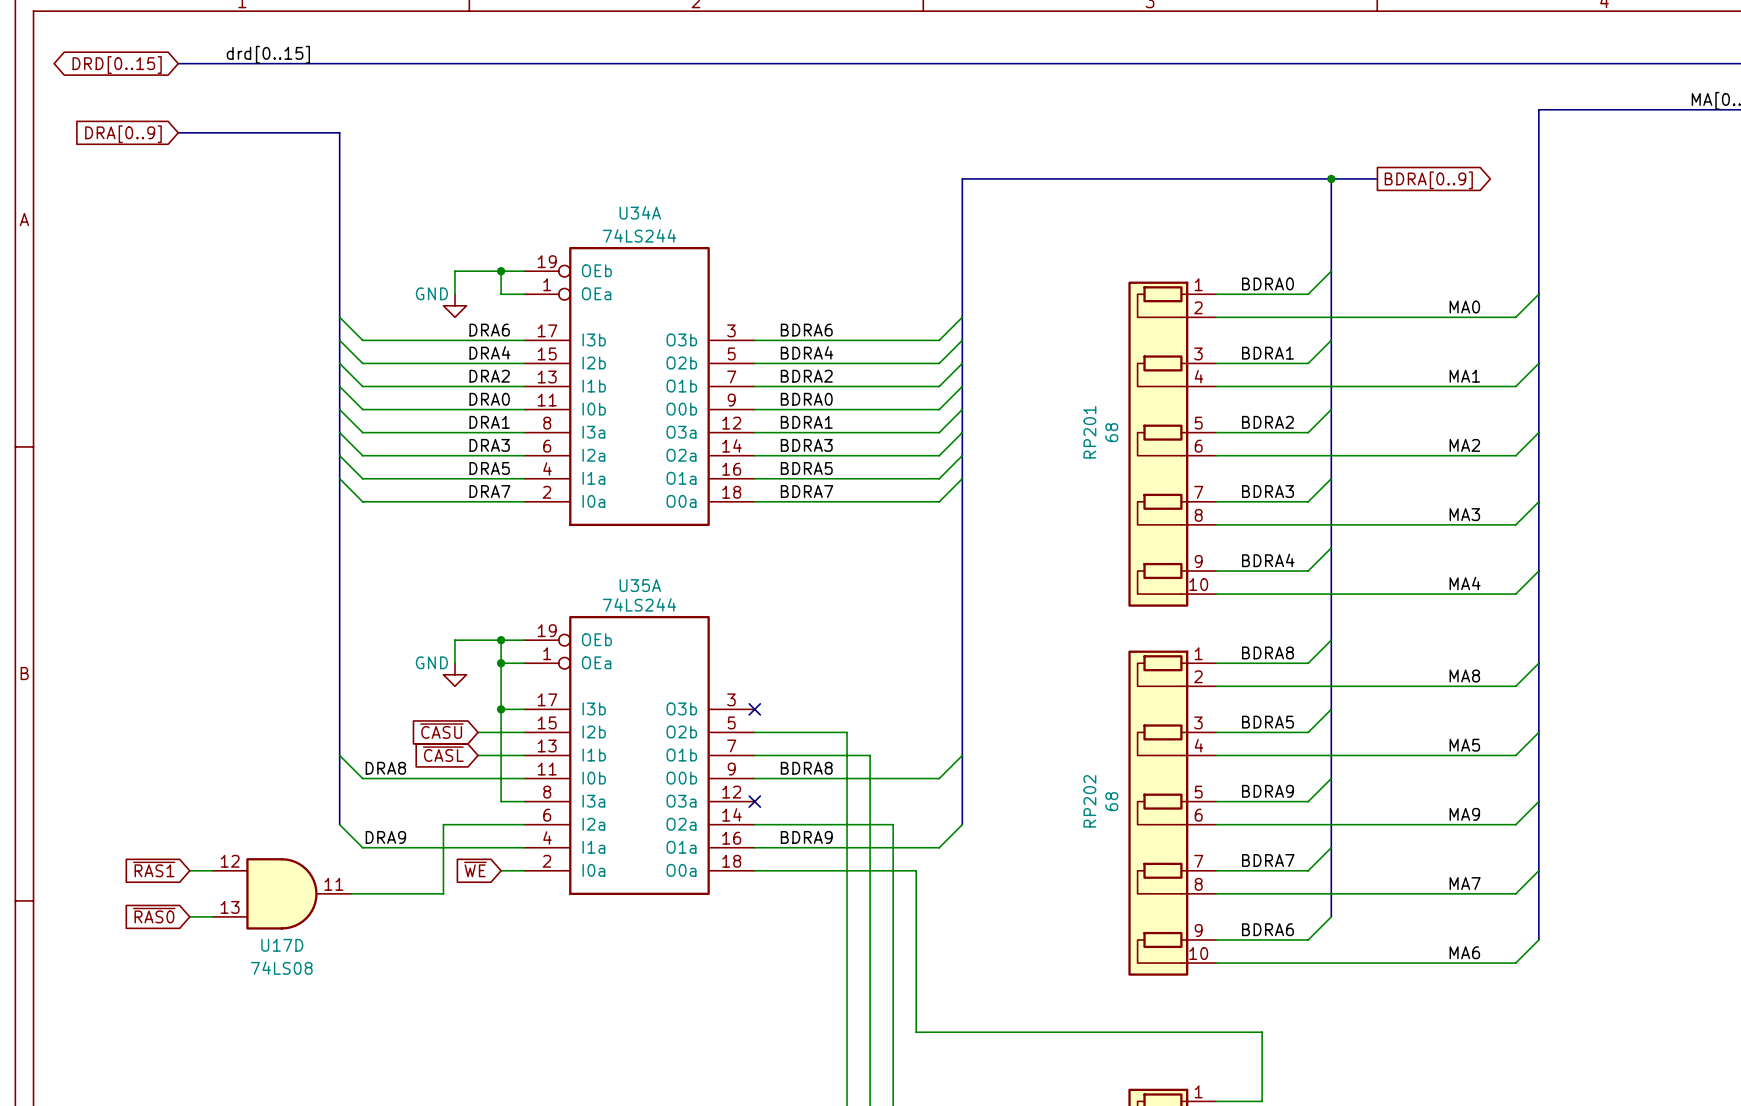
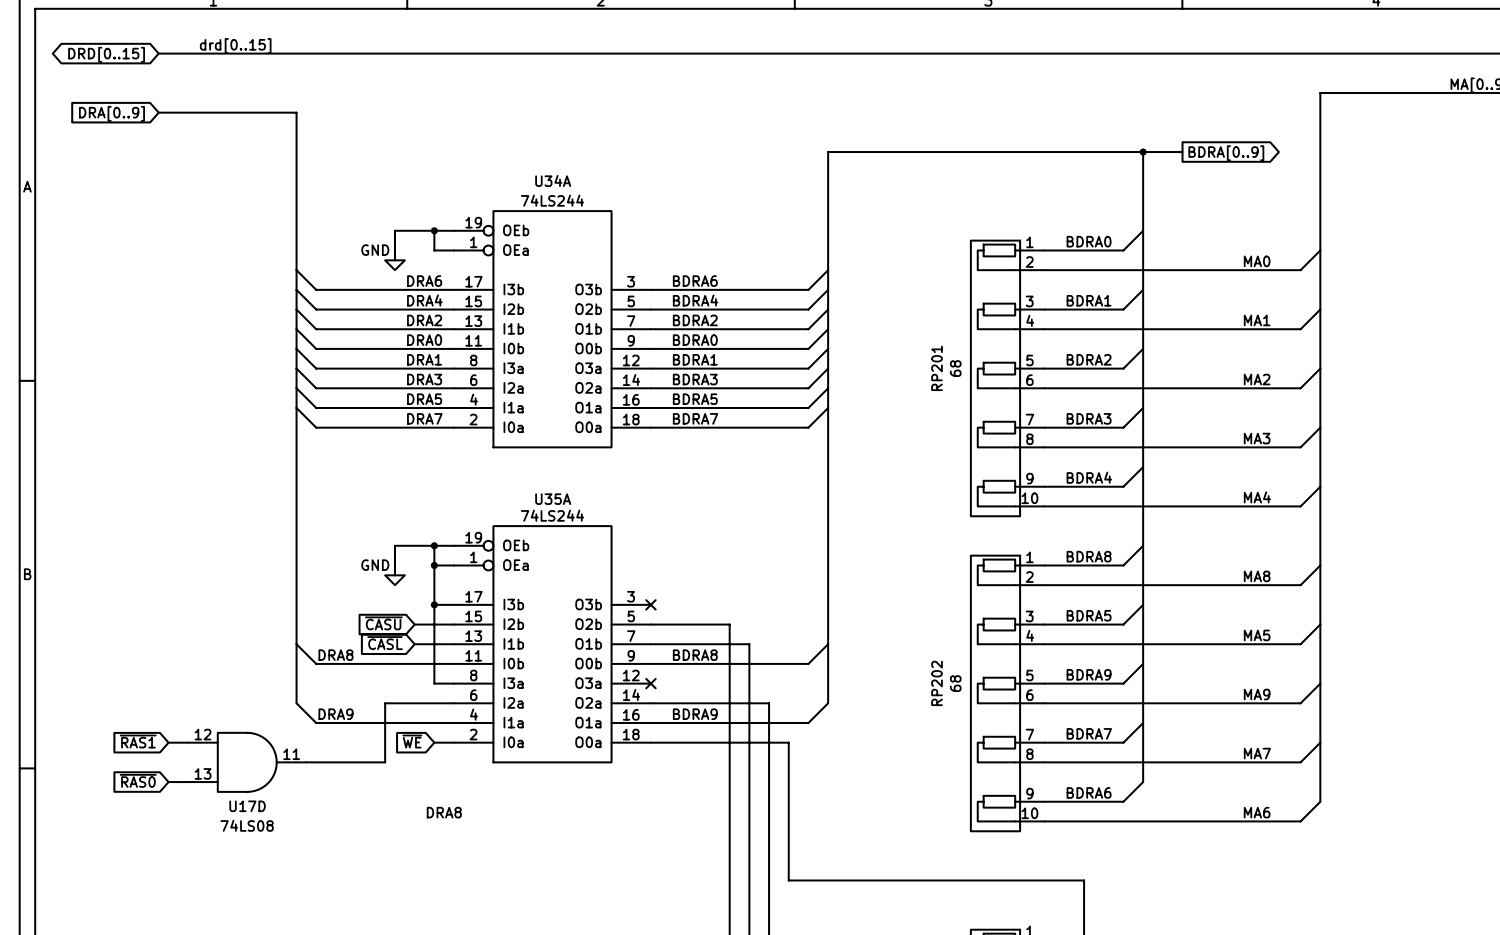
label: none -> DRA8 (444, 812)

